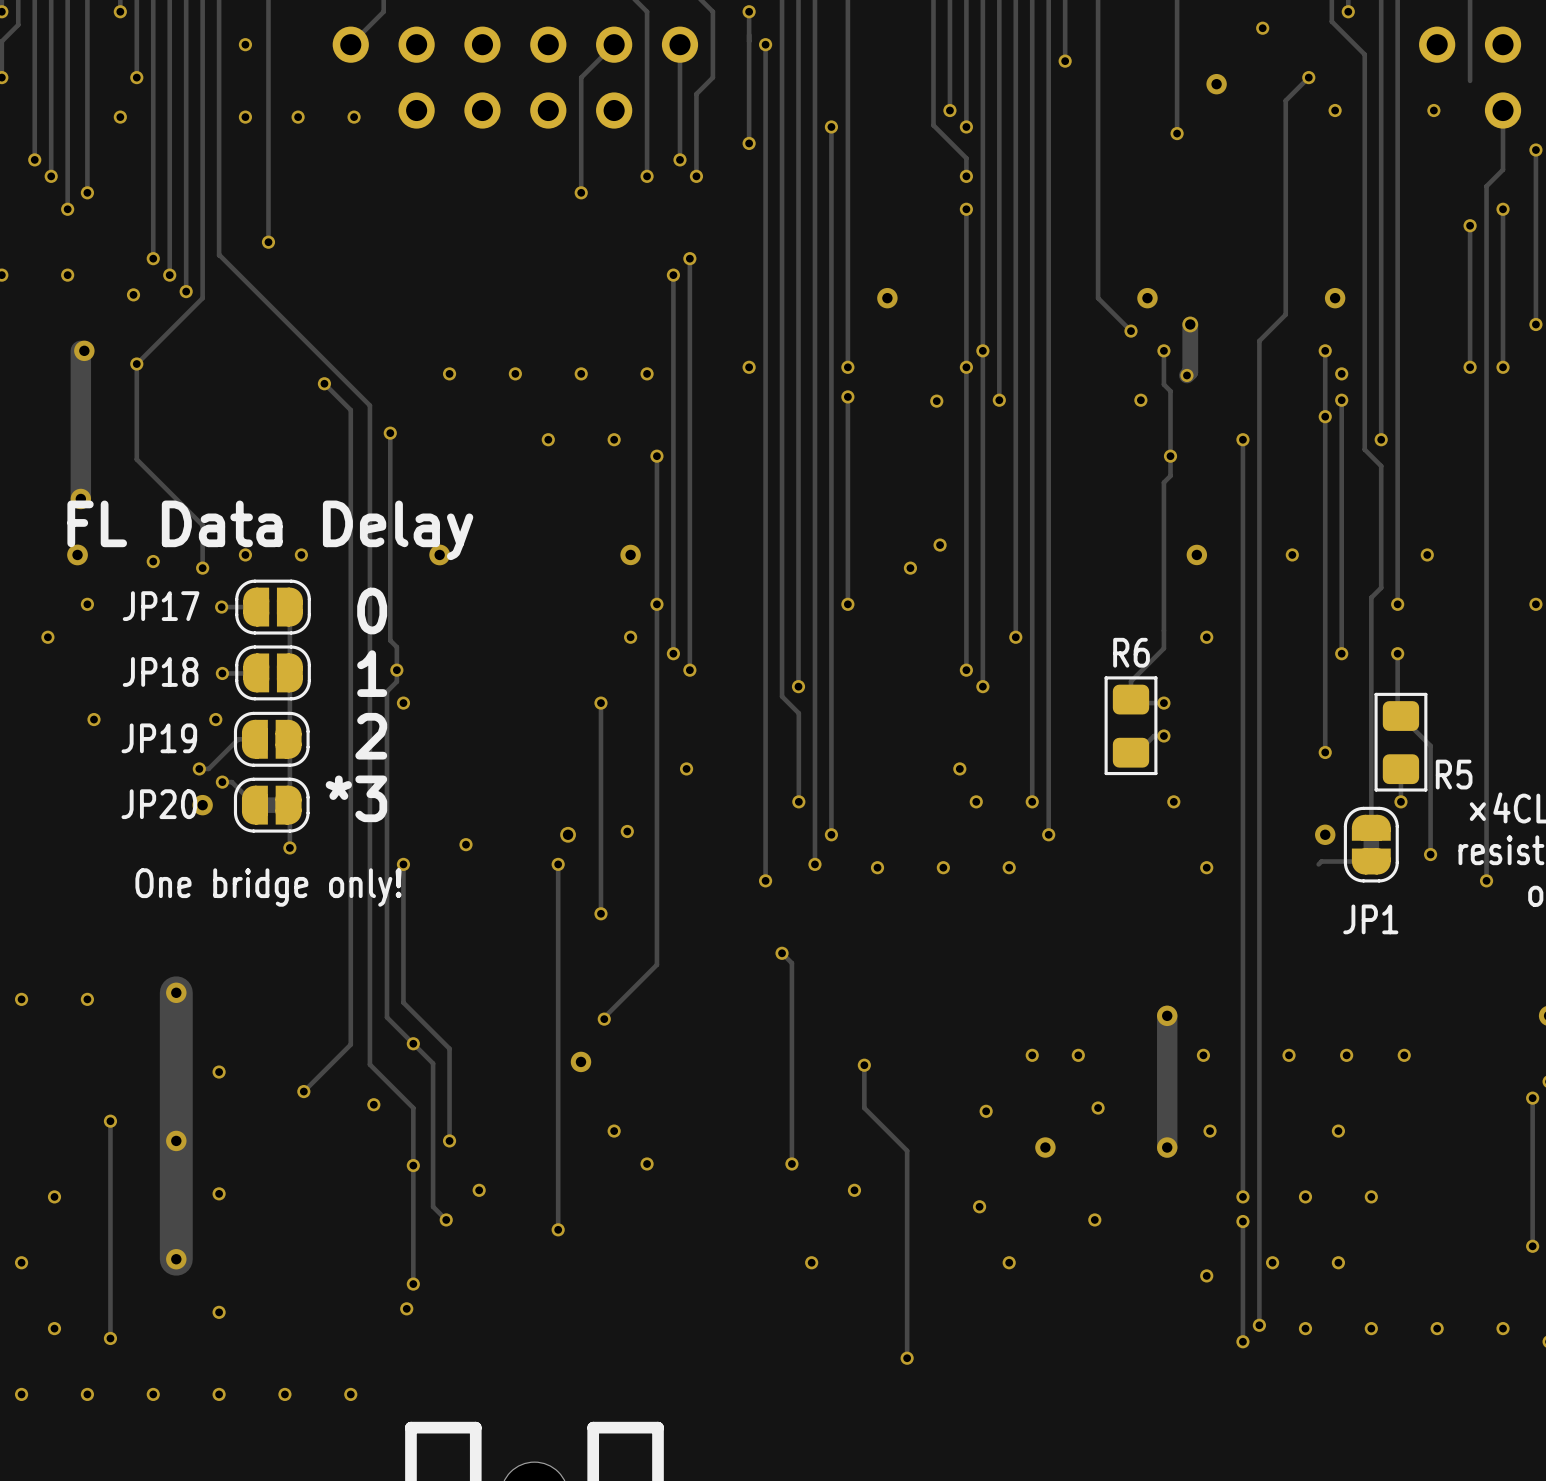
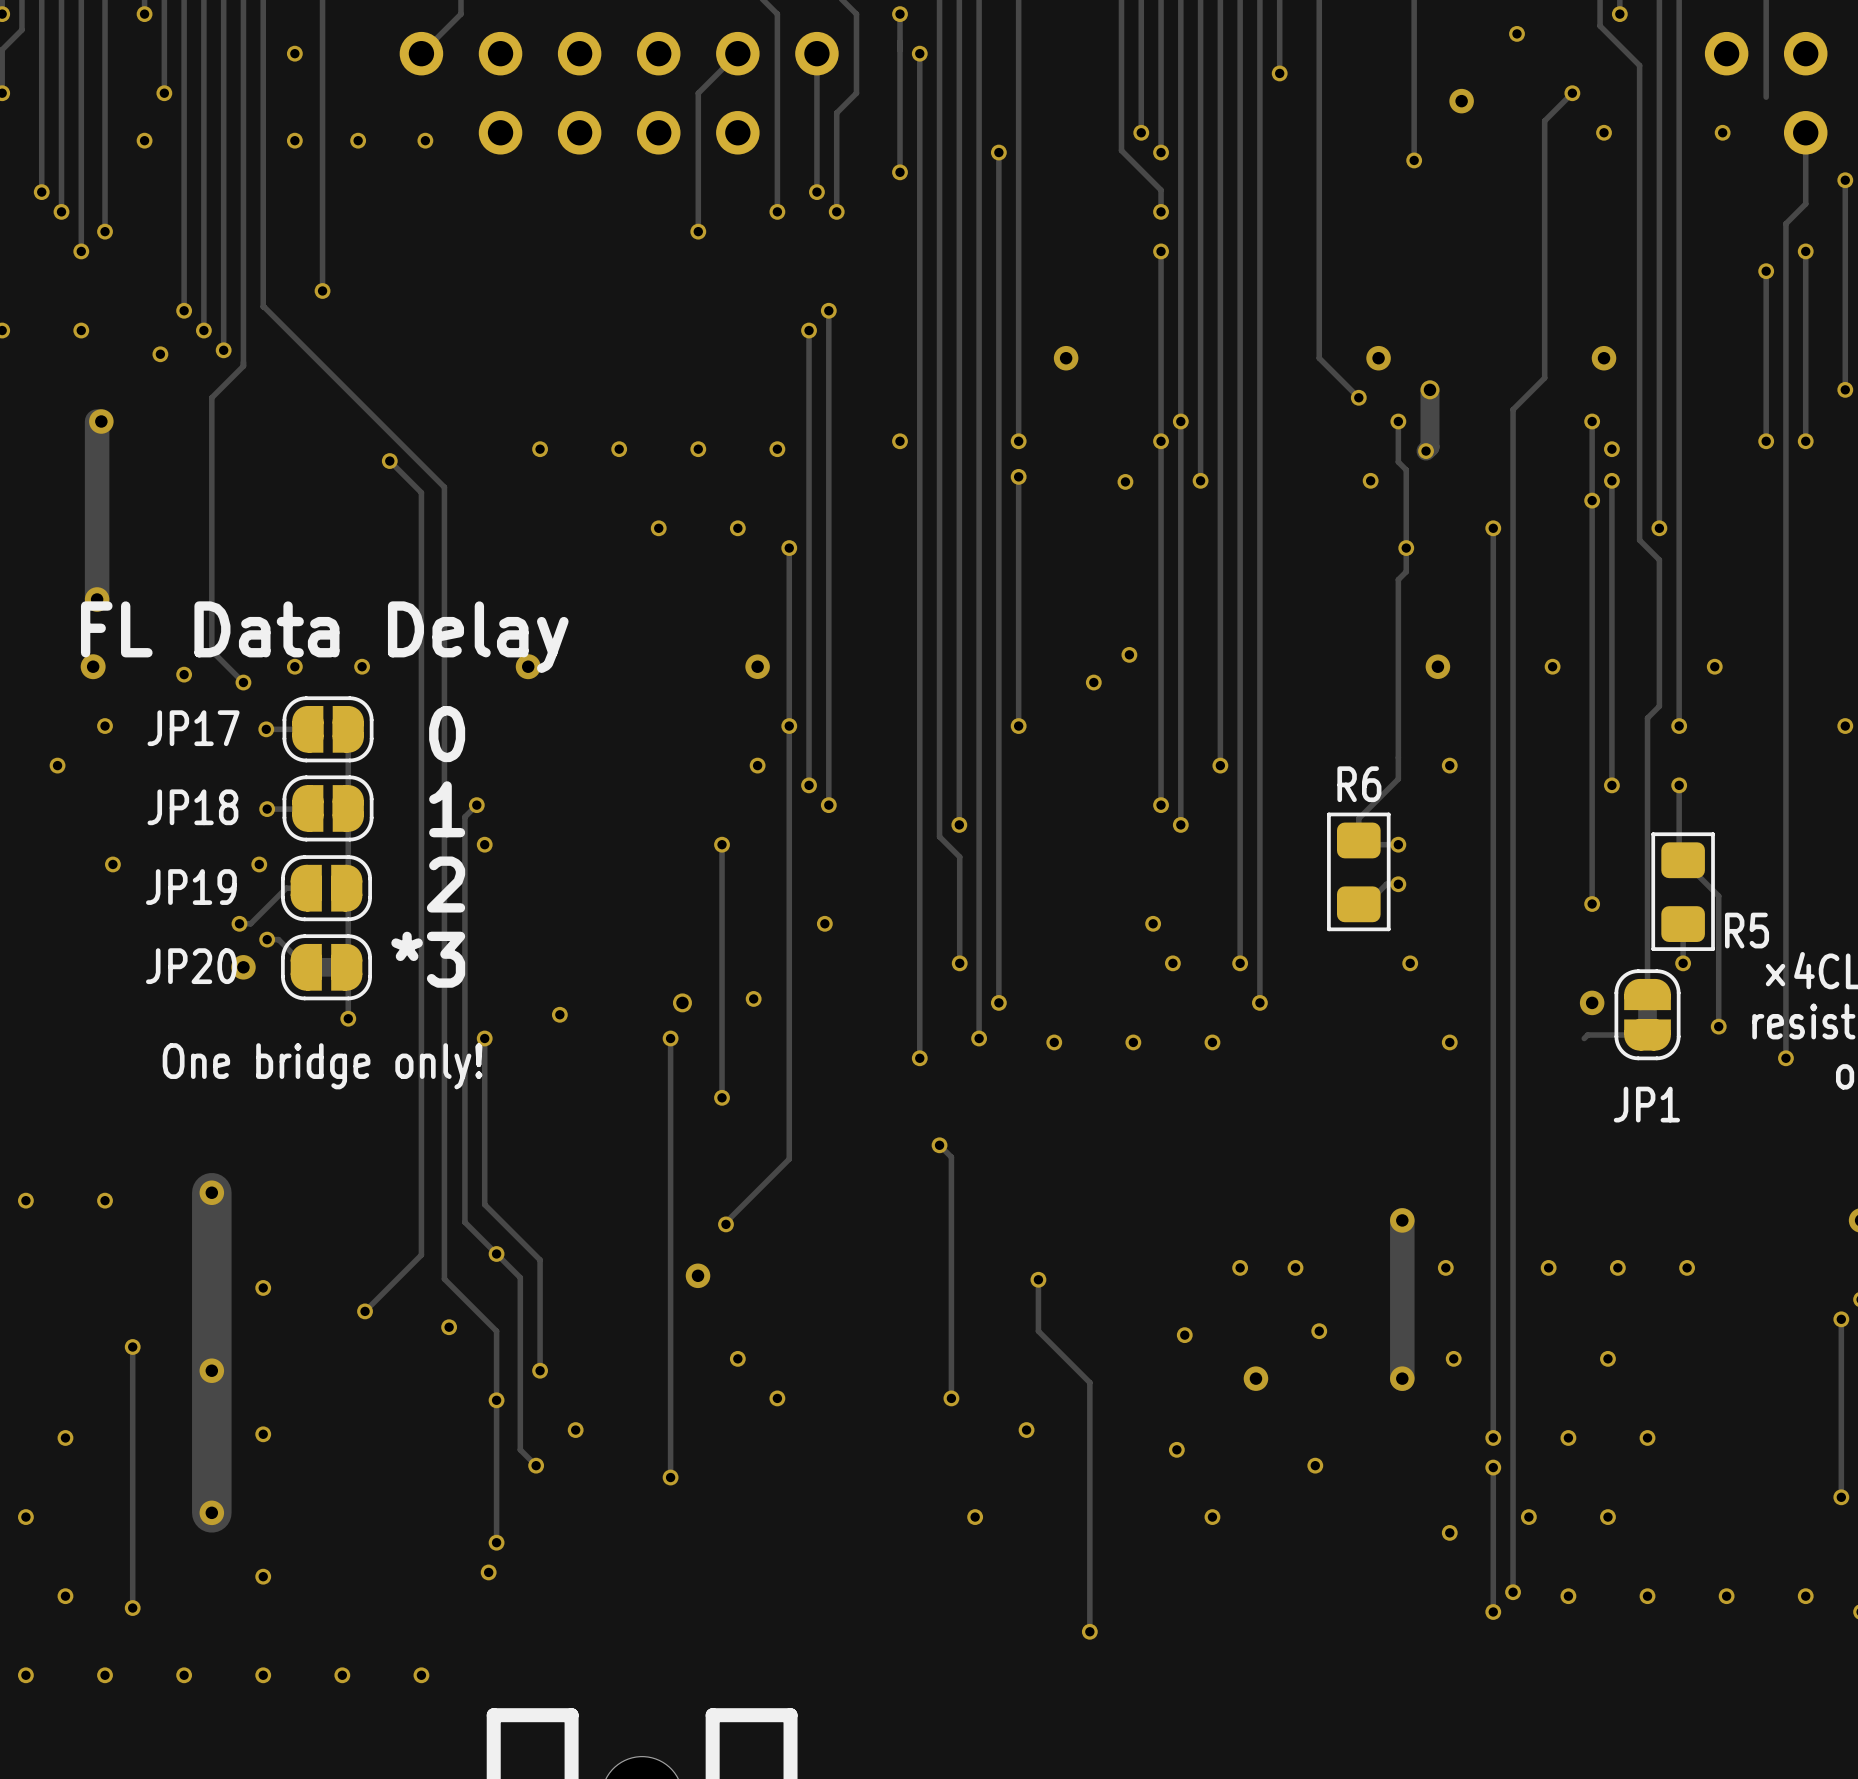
track: (202, 298) (136, 364) (136, 459) (202, 525) (202, 568) -> (243, 358) (243, 366) (211, 397) (211, 650) (243, 682)
via: (136, 364) -> none
track: (390, 433) (390, 640) (396, 647) (396, 681) (386, 691) -> (476, 805) (464, 817) (464, 830)
via: (390, 433) -> none

